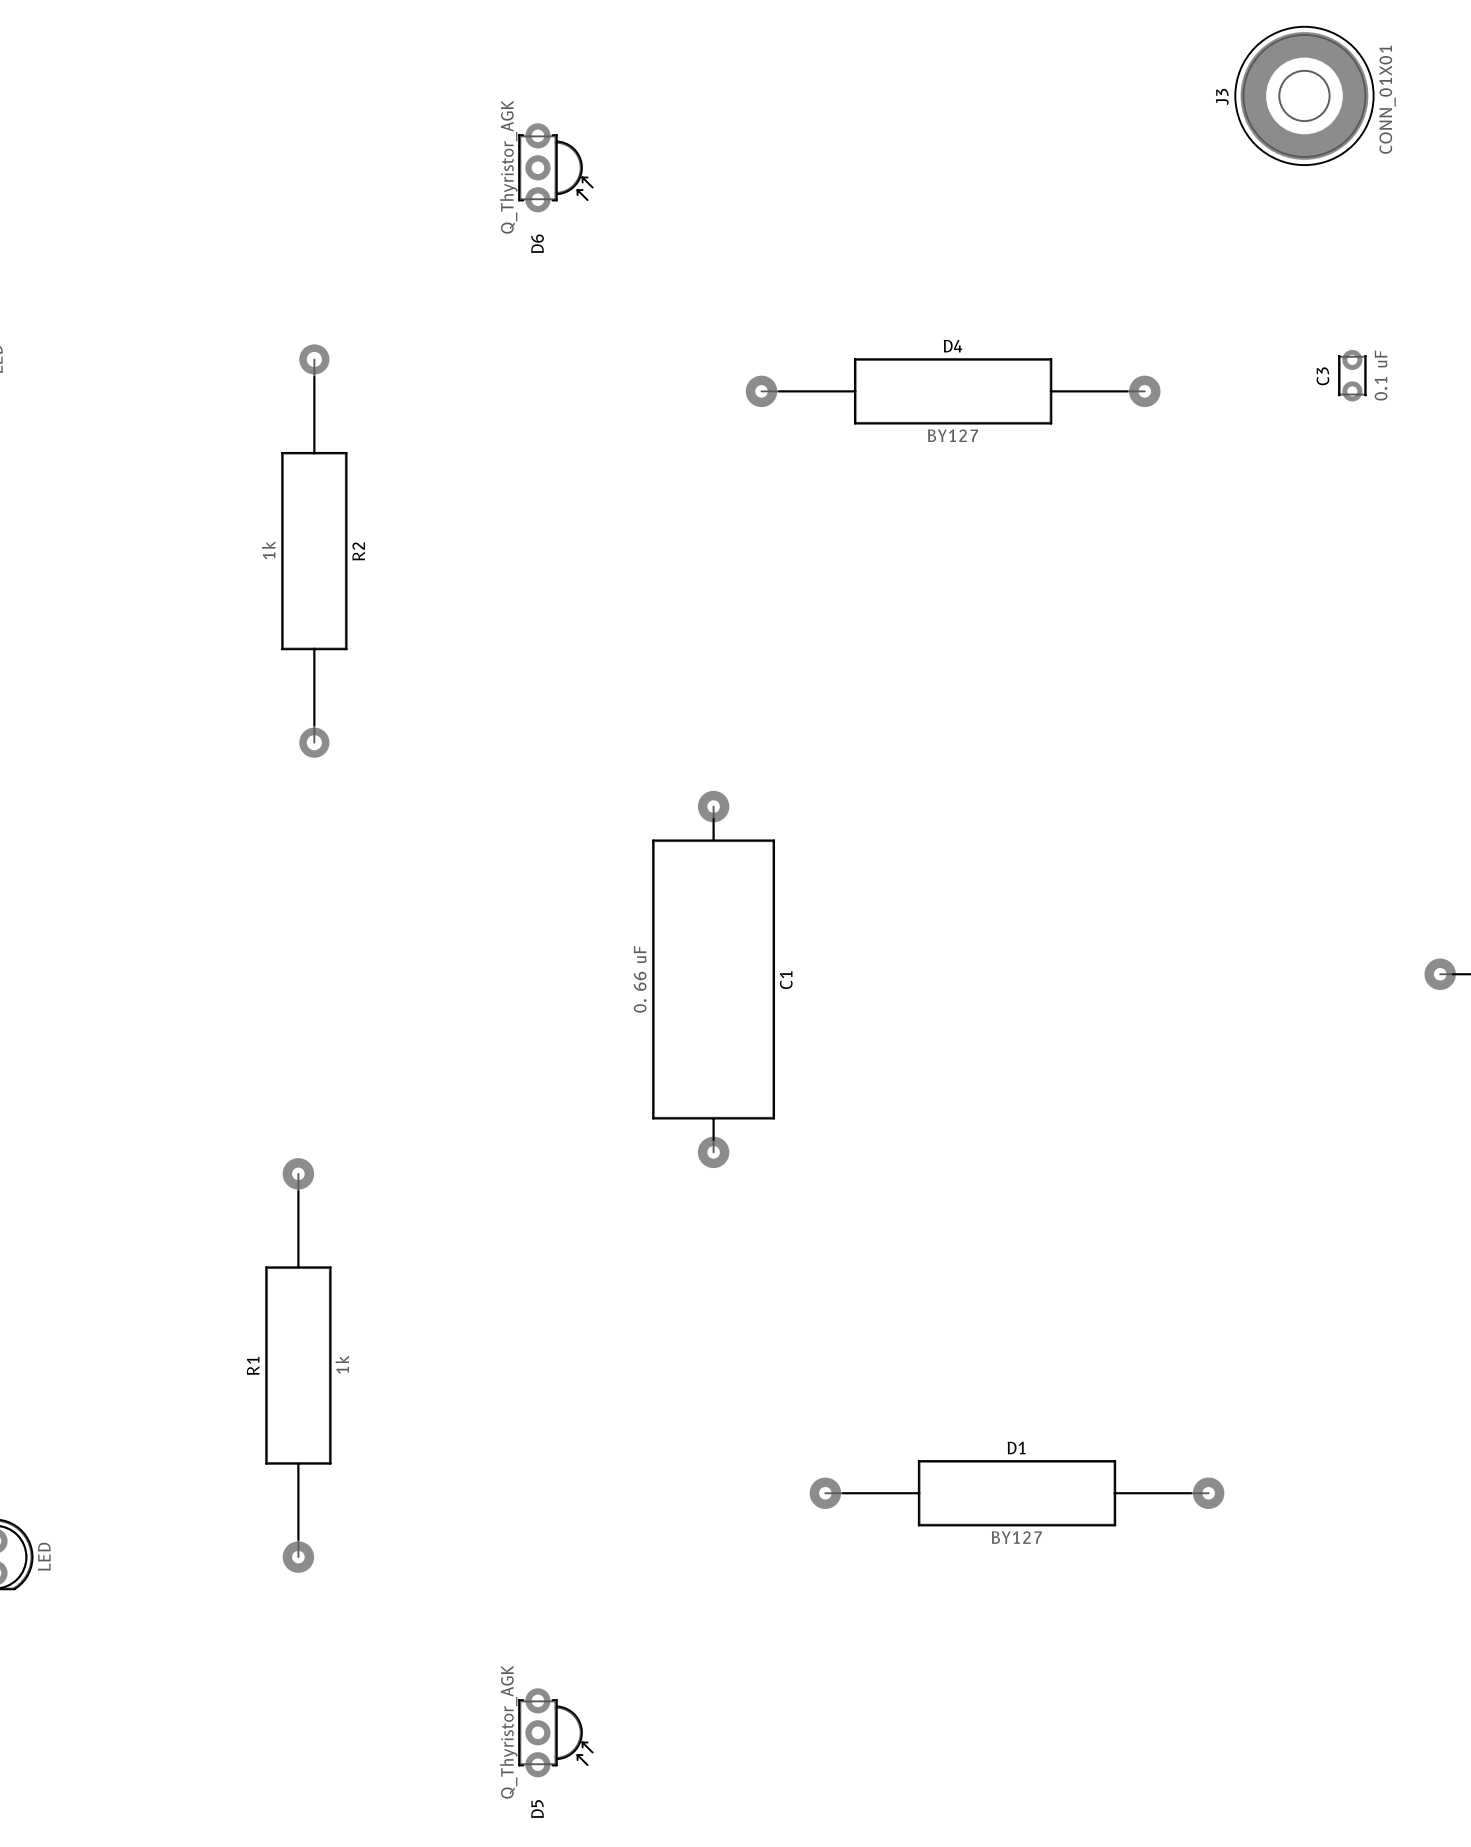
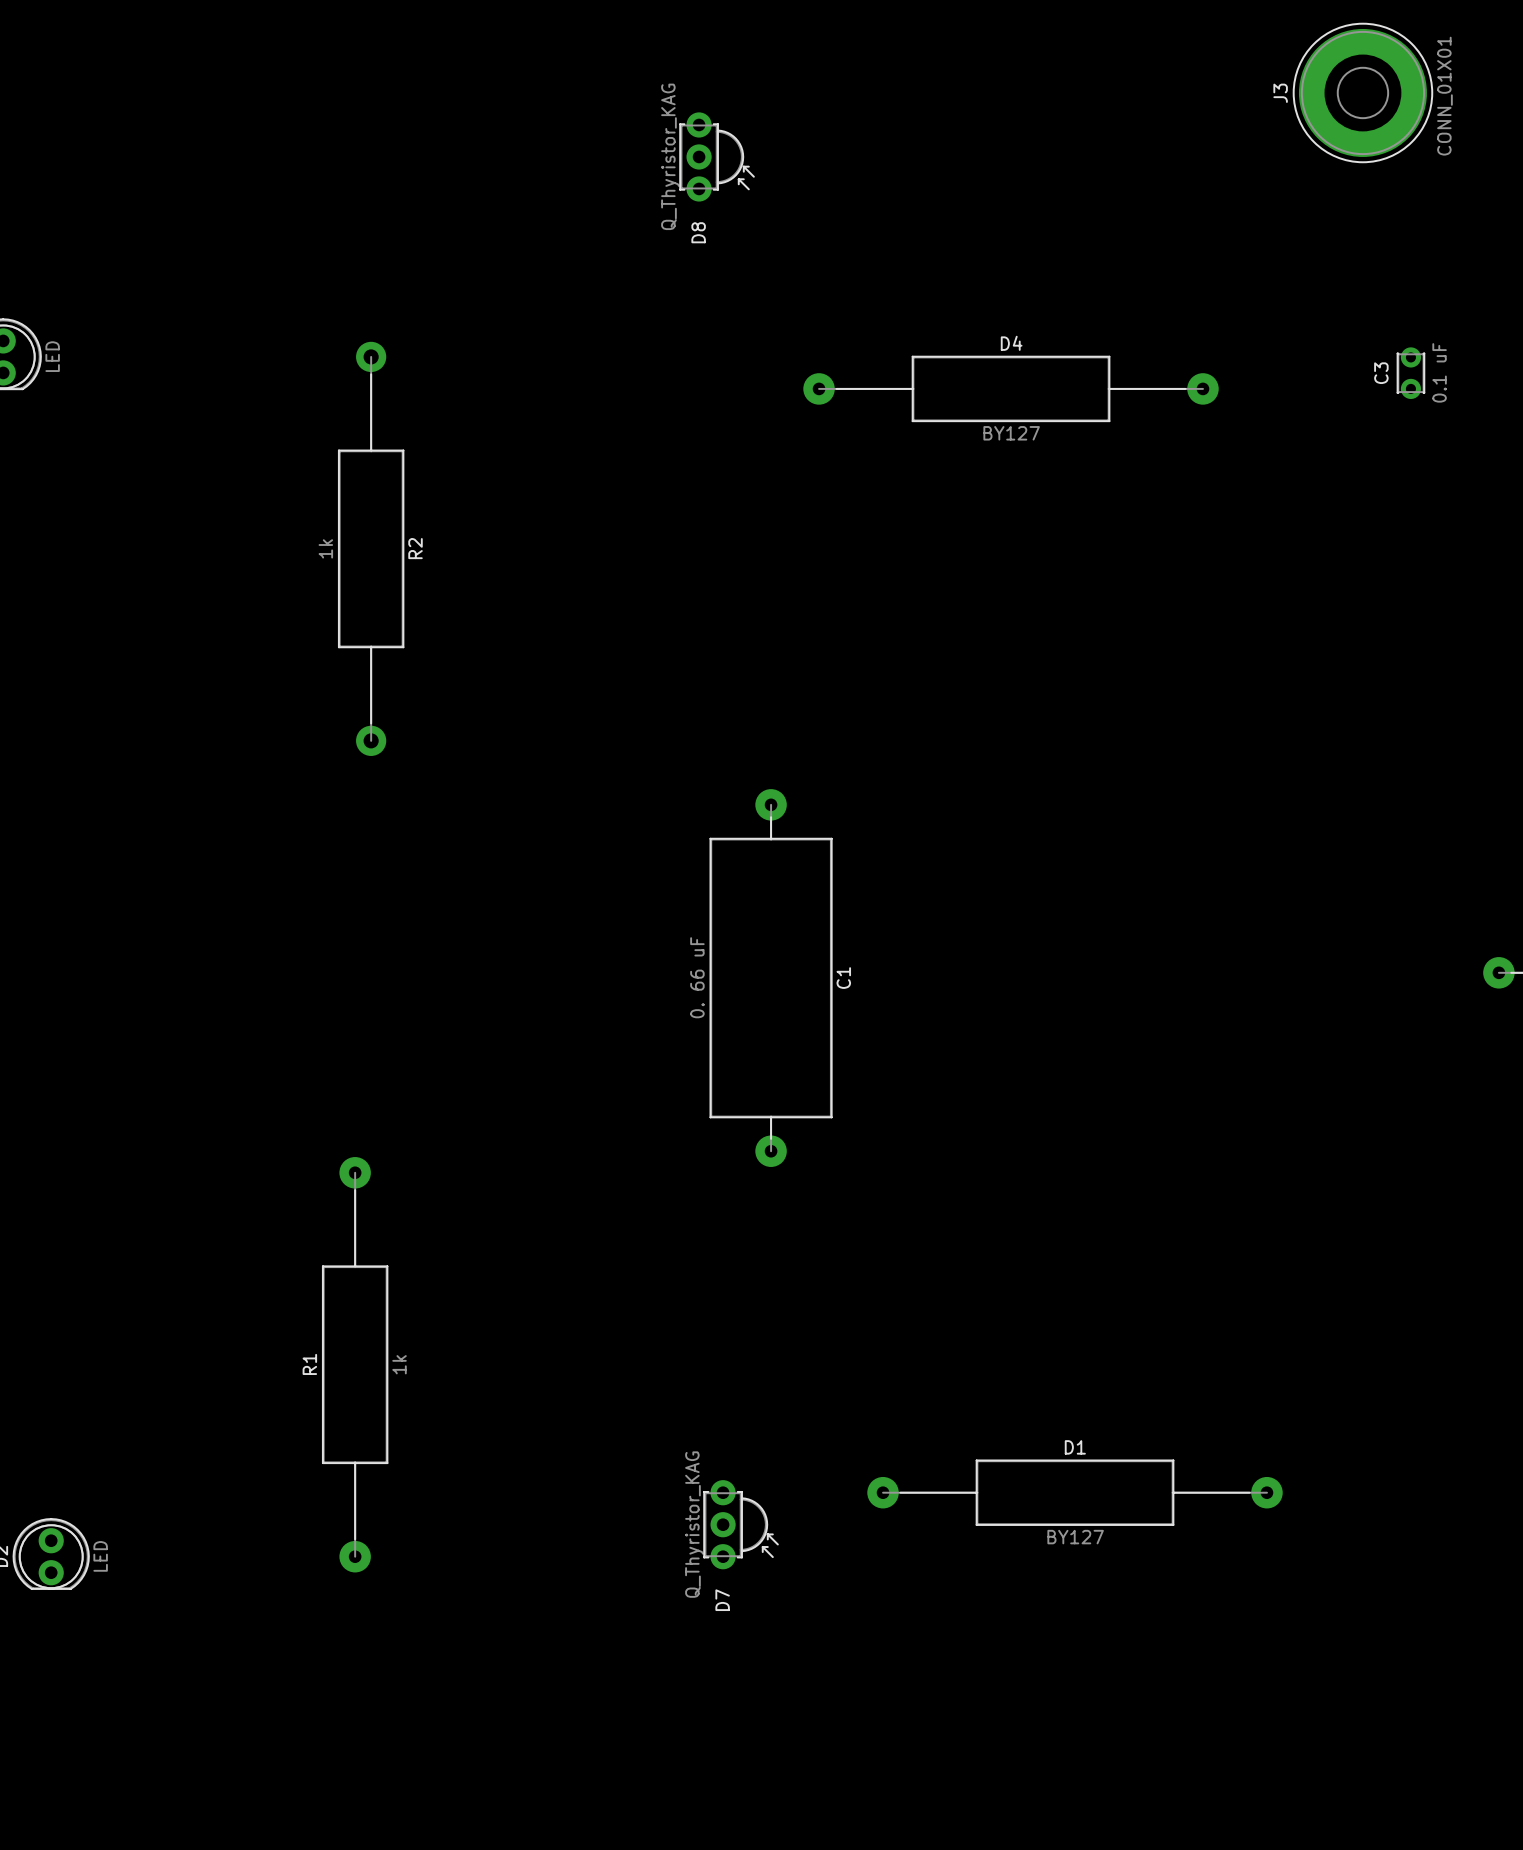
D8: none -> Q_Thyristor_KAG (717, 156)
D6: Q_Thyristor_AGK (555, 167) -> none
D7: none -> Q_Thyristor_KAG (741, 1524)
D5: Q_Thyristor_AGK (555, 1732) -> none

